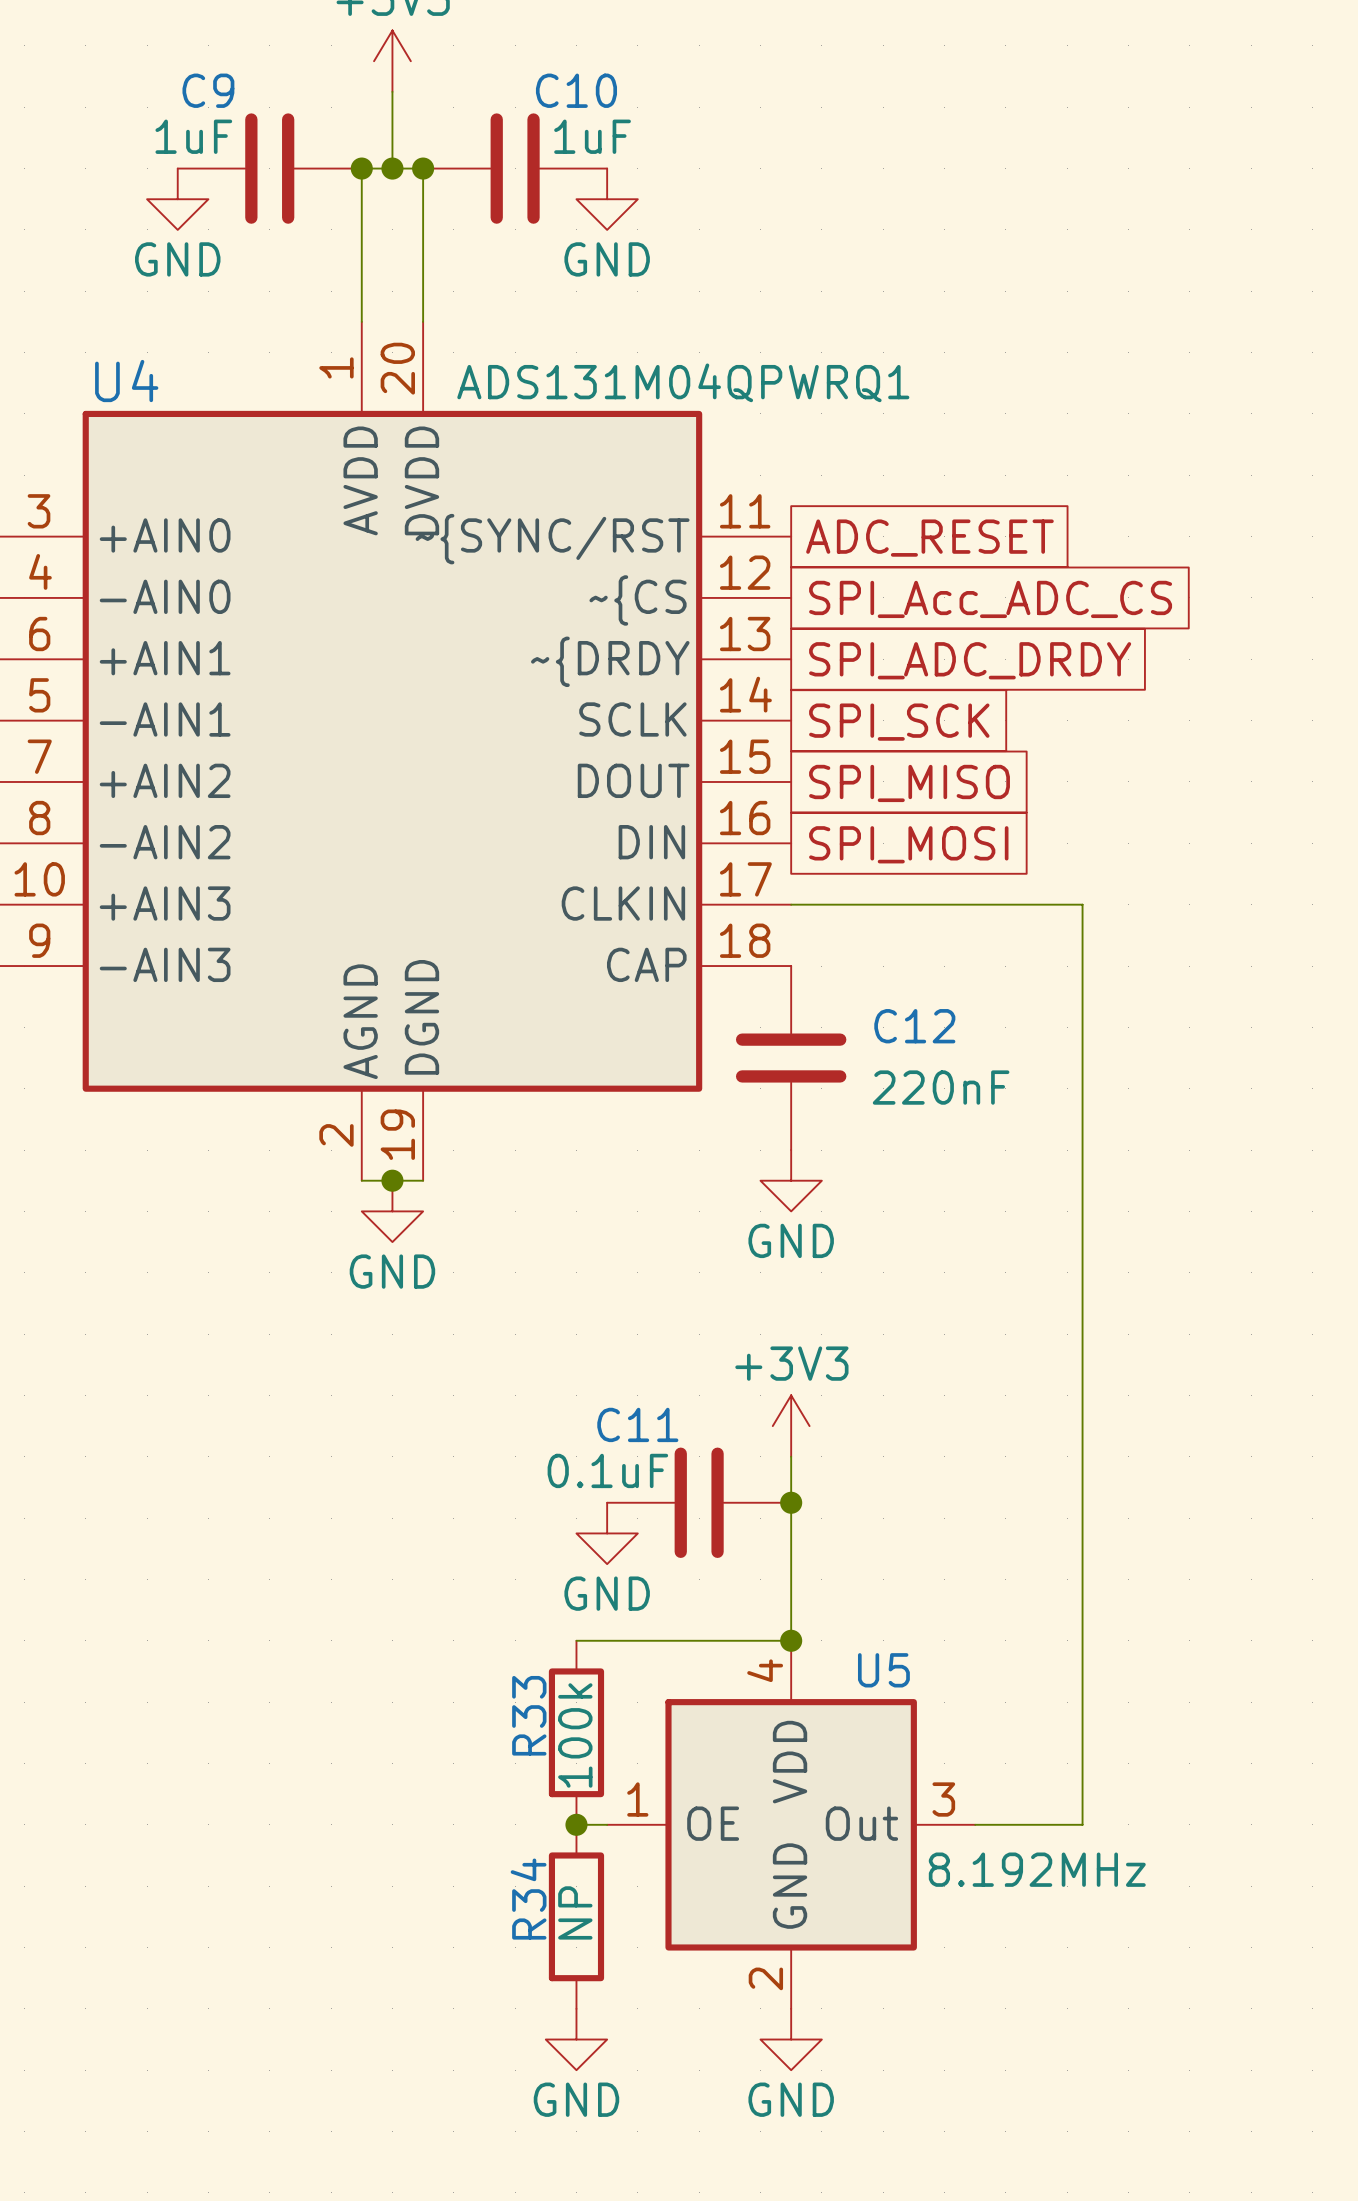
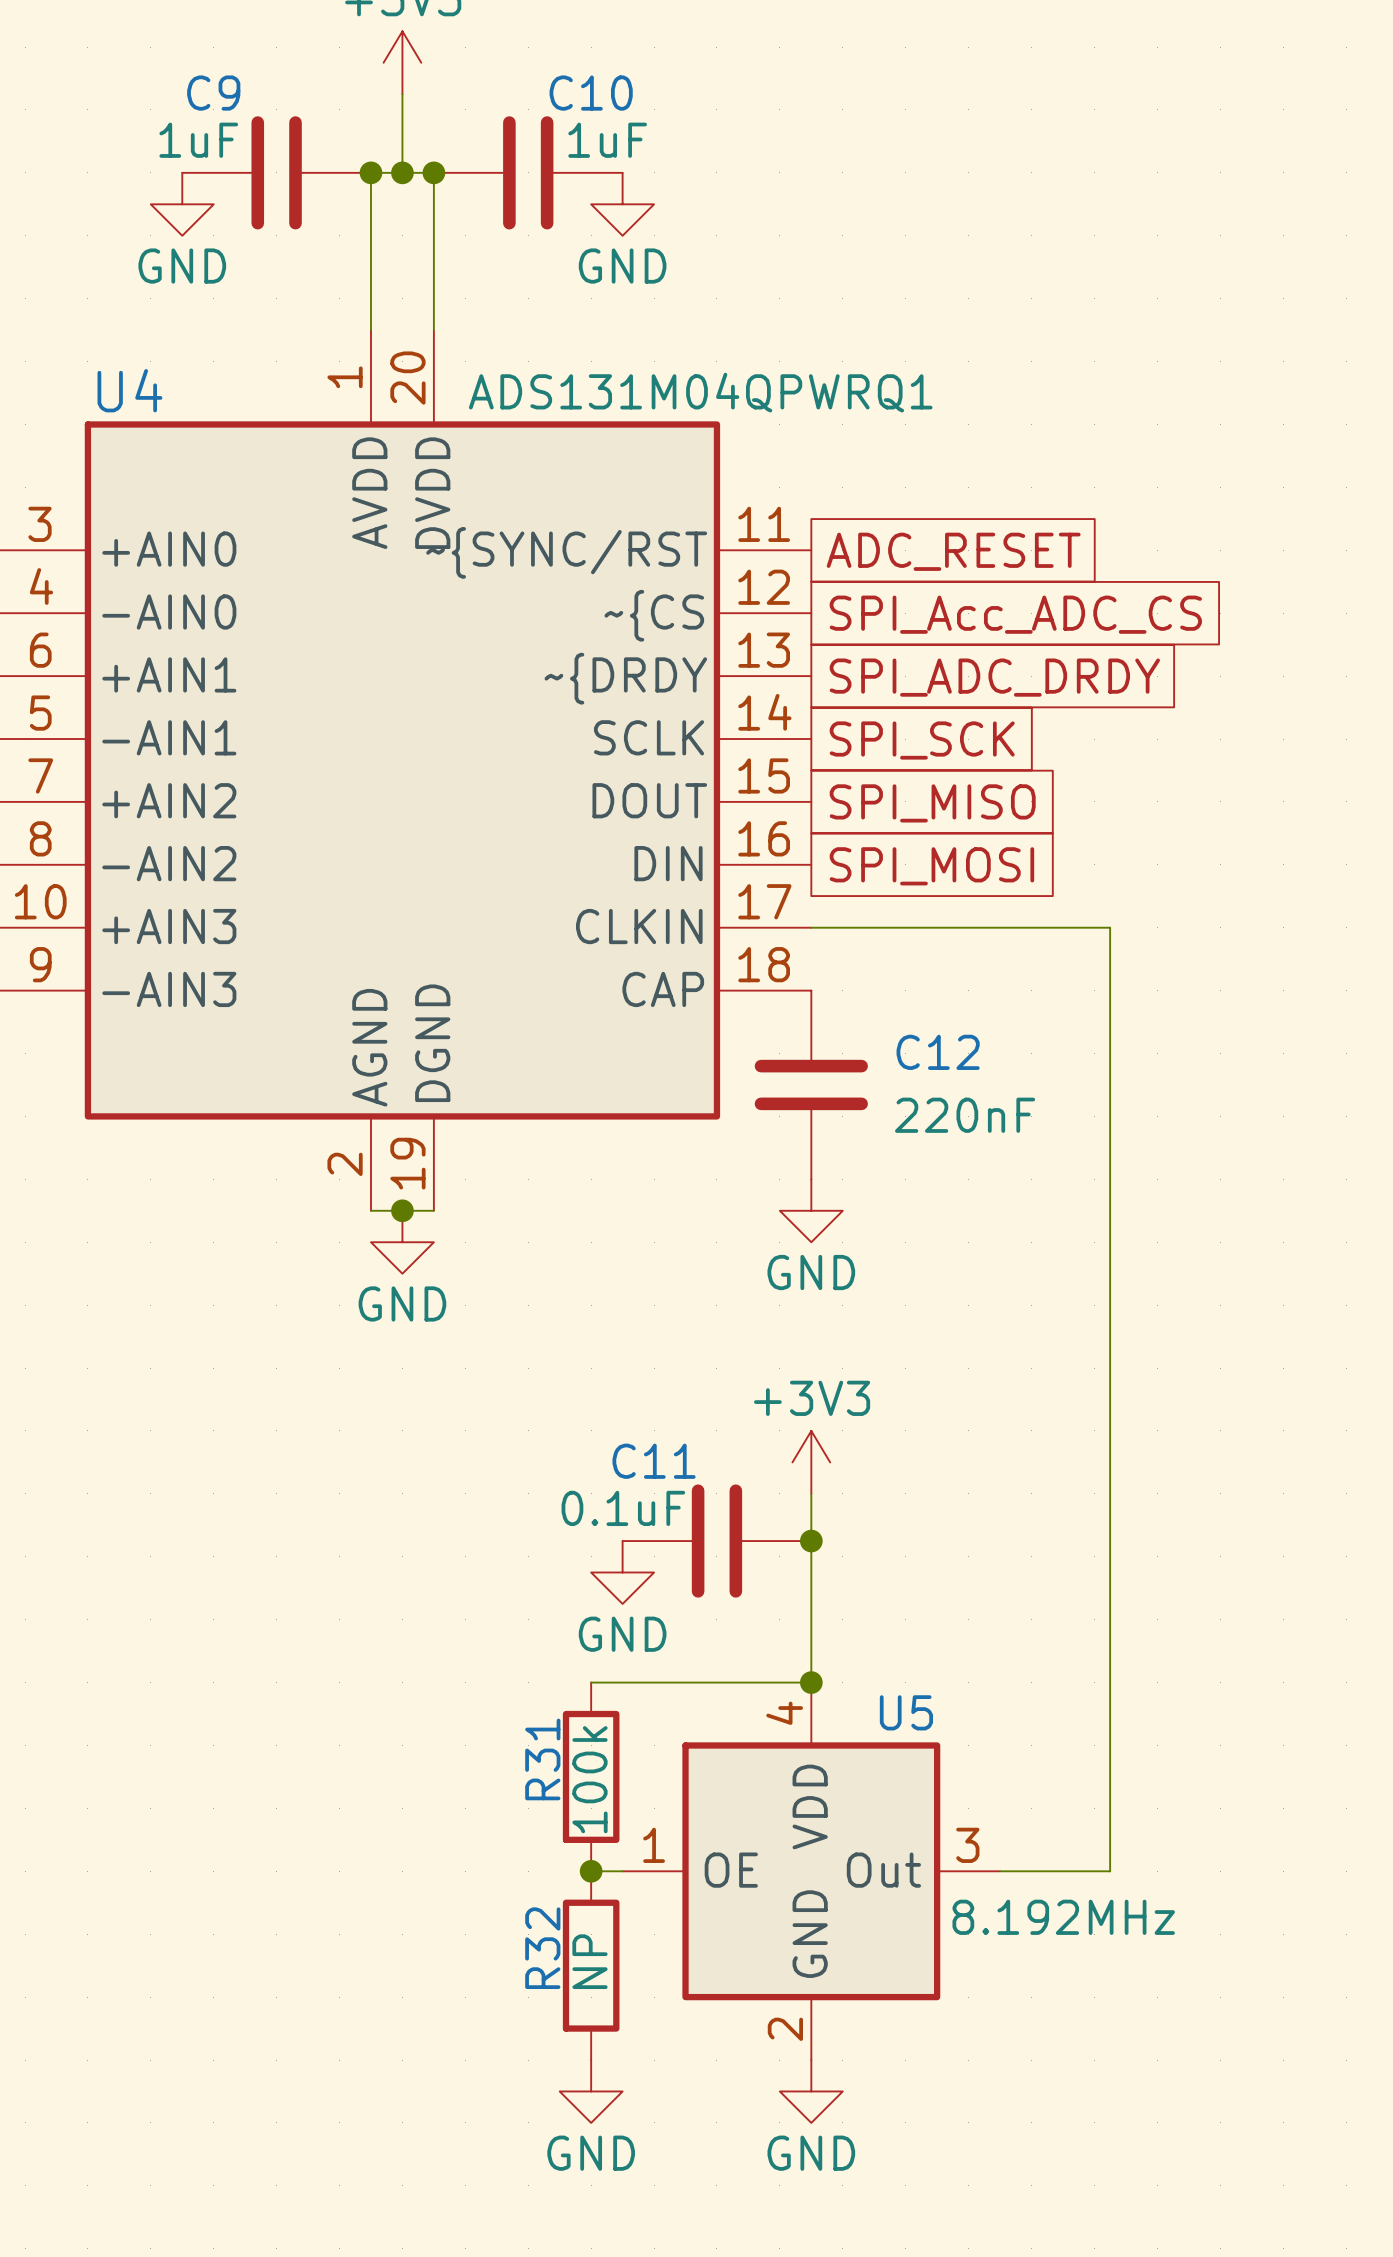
R33 name: R33 (529, 1715) -> R31 (542, 1759)
R34 name: R34 (528, 1899) -> R32 (542, 1948)

